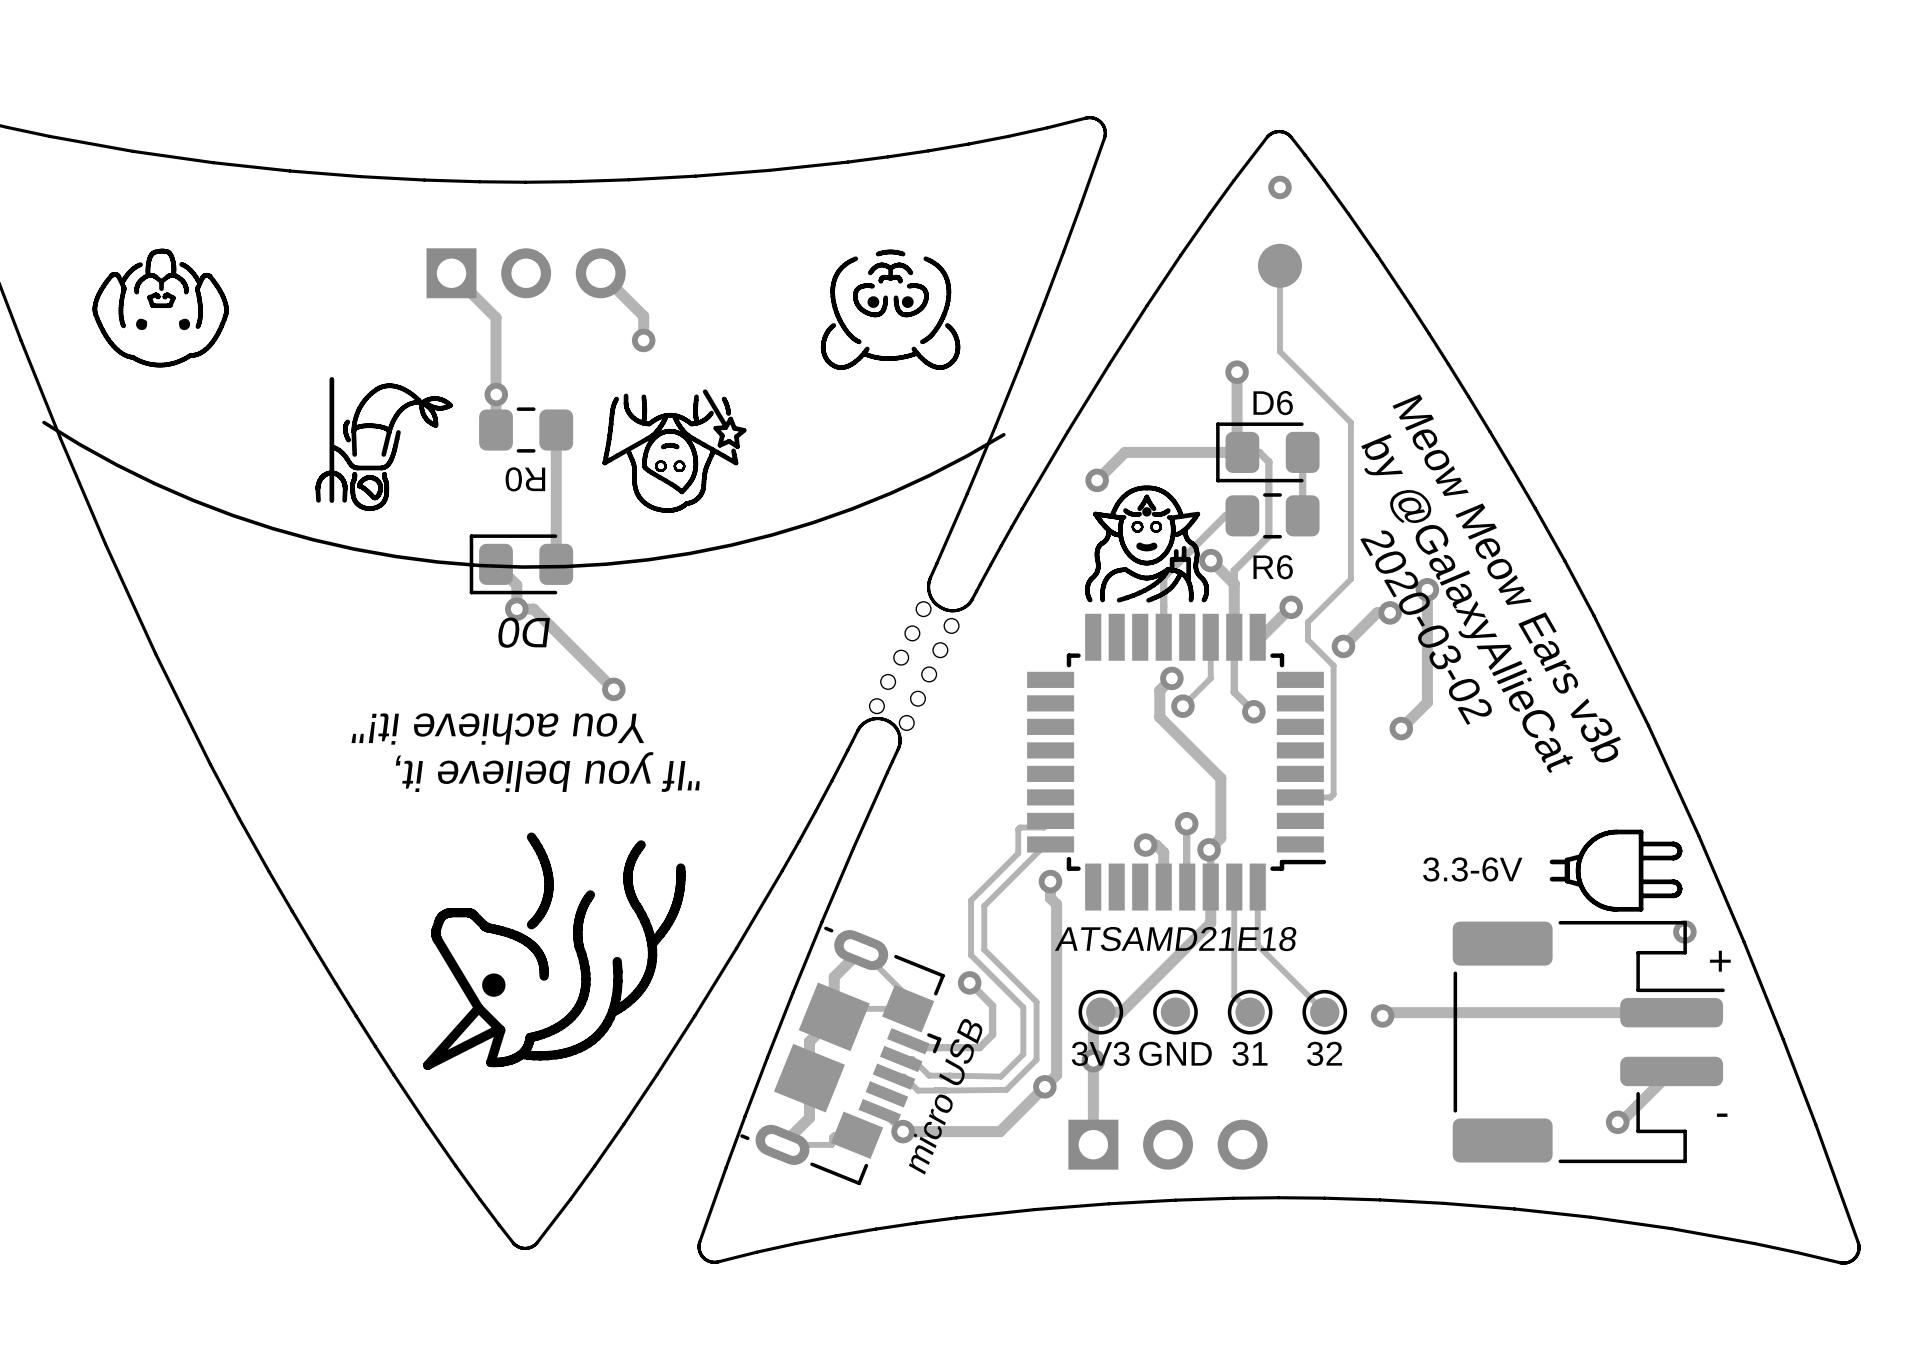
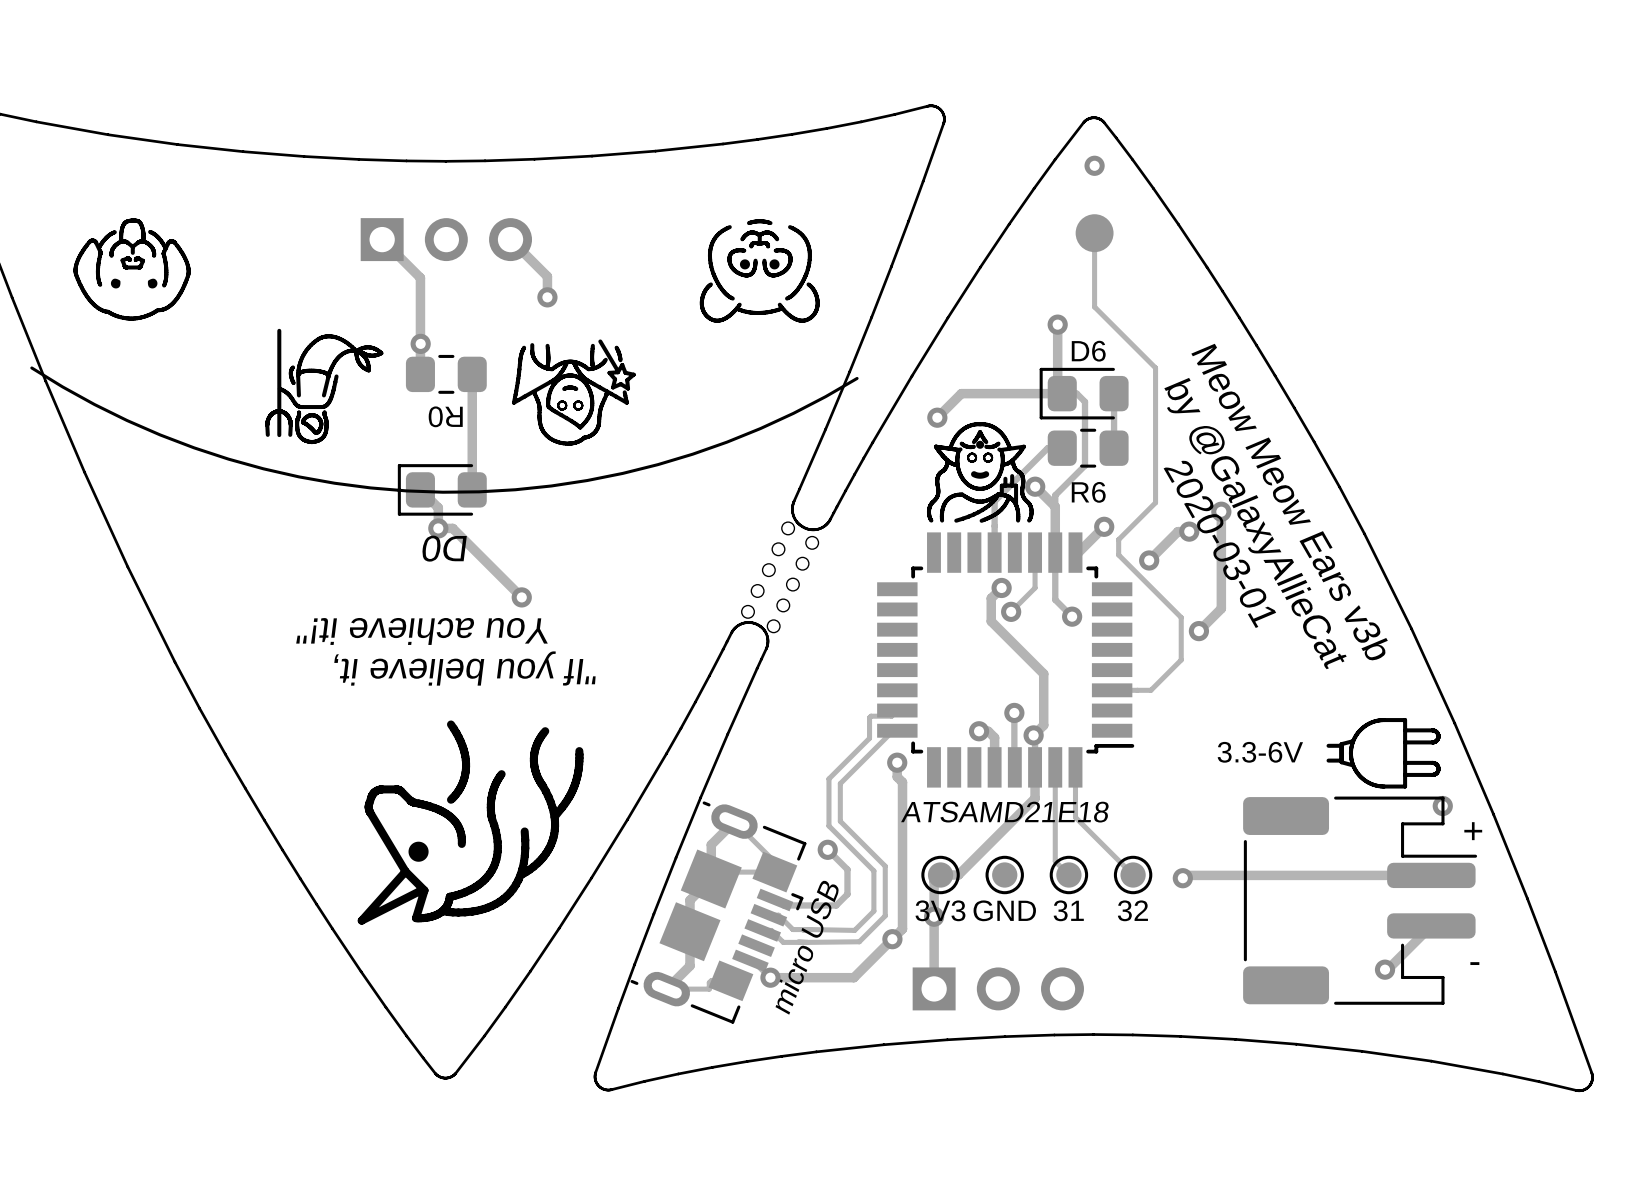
text: 2020-03-02 (1426, 627) -> 2020-03-01 (1219, 544)
track: (1333, 665) (1333, 794) (1330, 797) -> (1140, 576) (1181, 617) (1181, 659) (1150, 690) (1137, 690)

